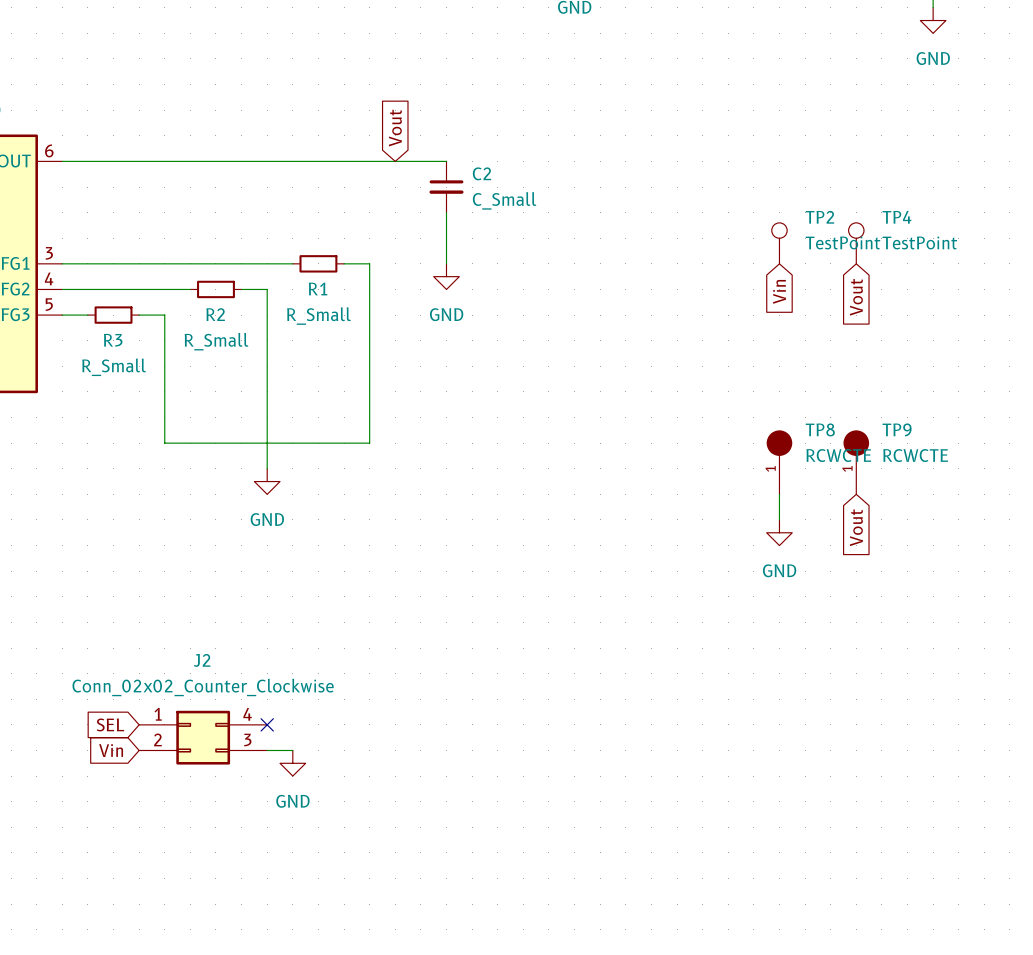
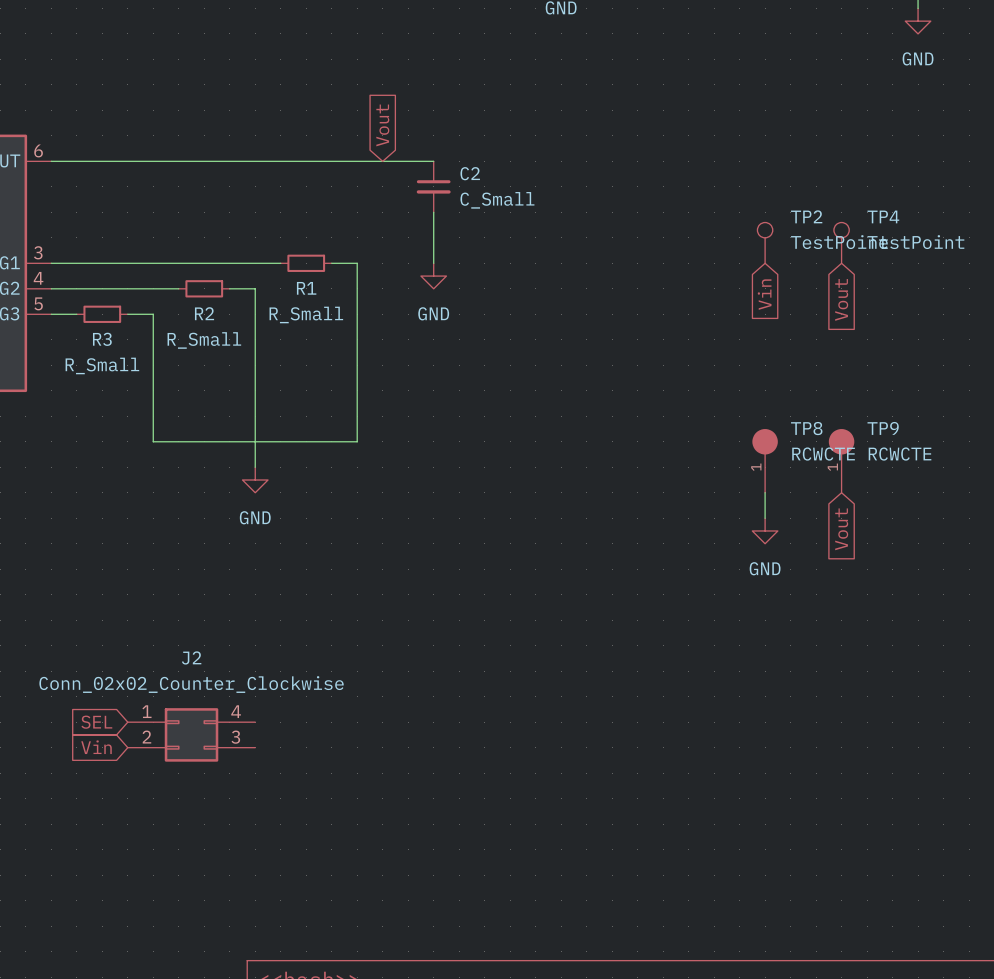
no-connect mark: (267, 724) -> none
wire: (267, 750) (292, 750) -> none
power symbol: GND (292, 763) -> none

